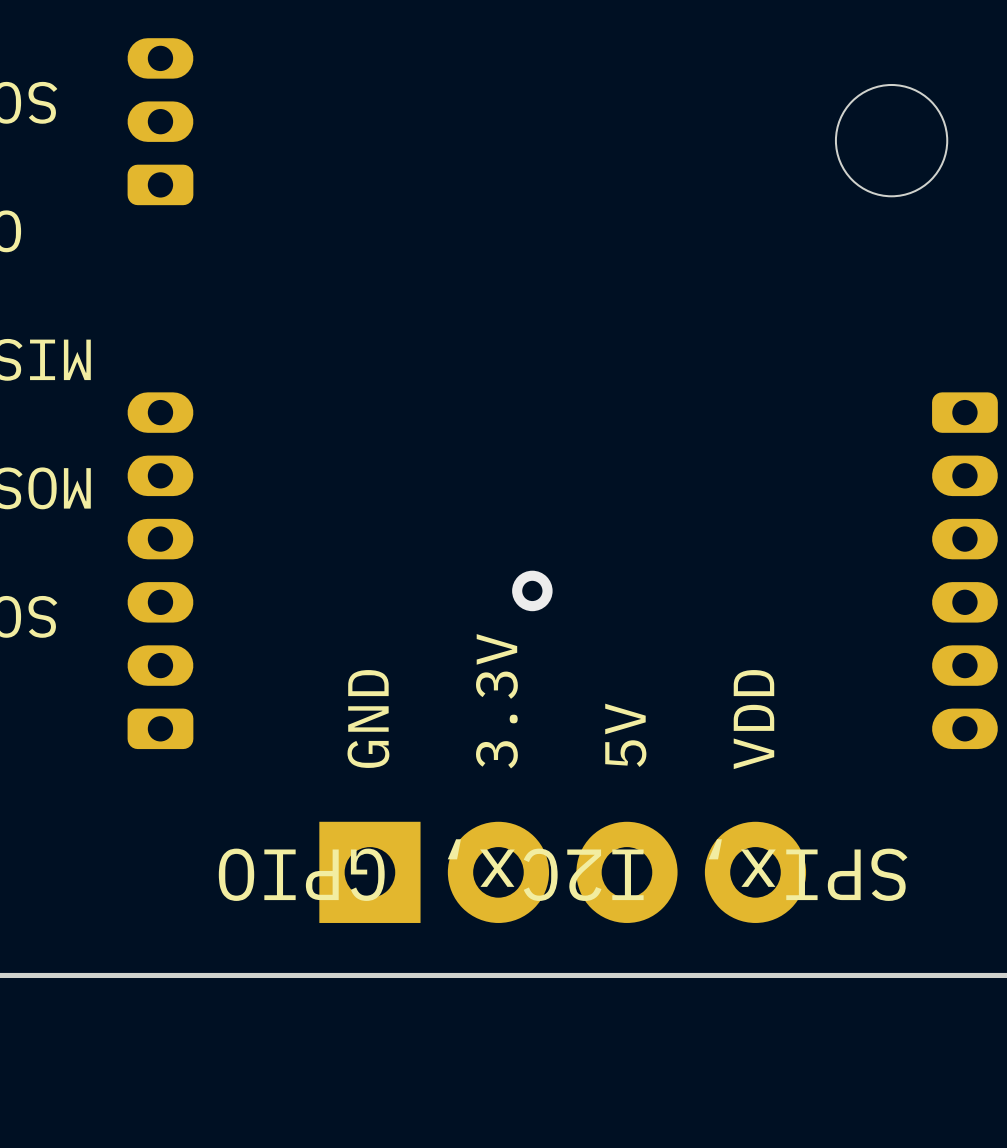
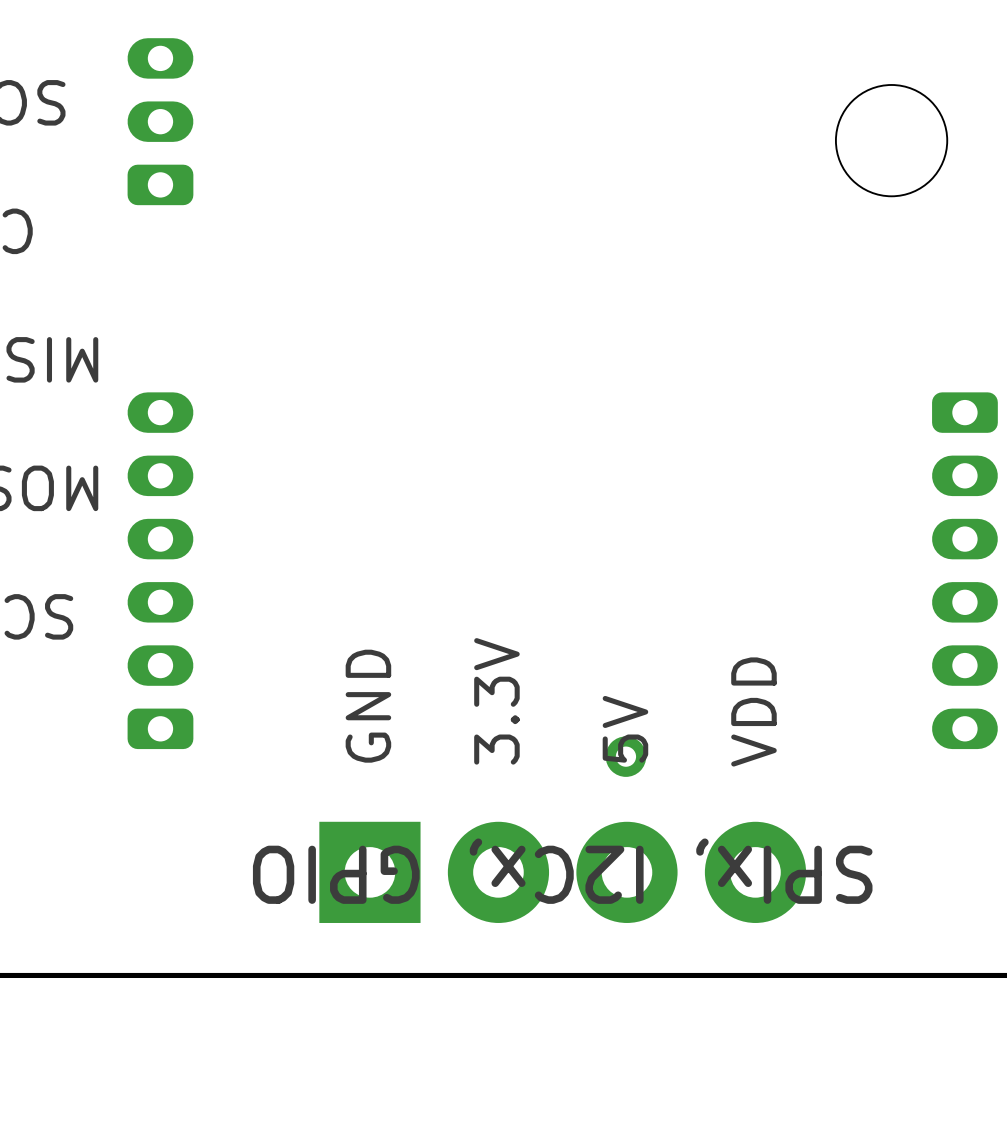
via position: (532, 590) -> (625, 756)

